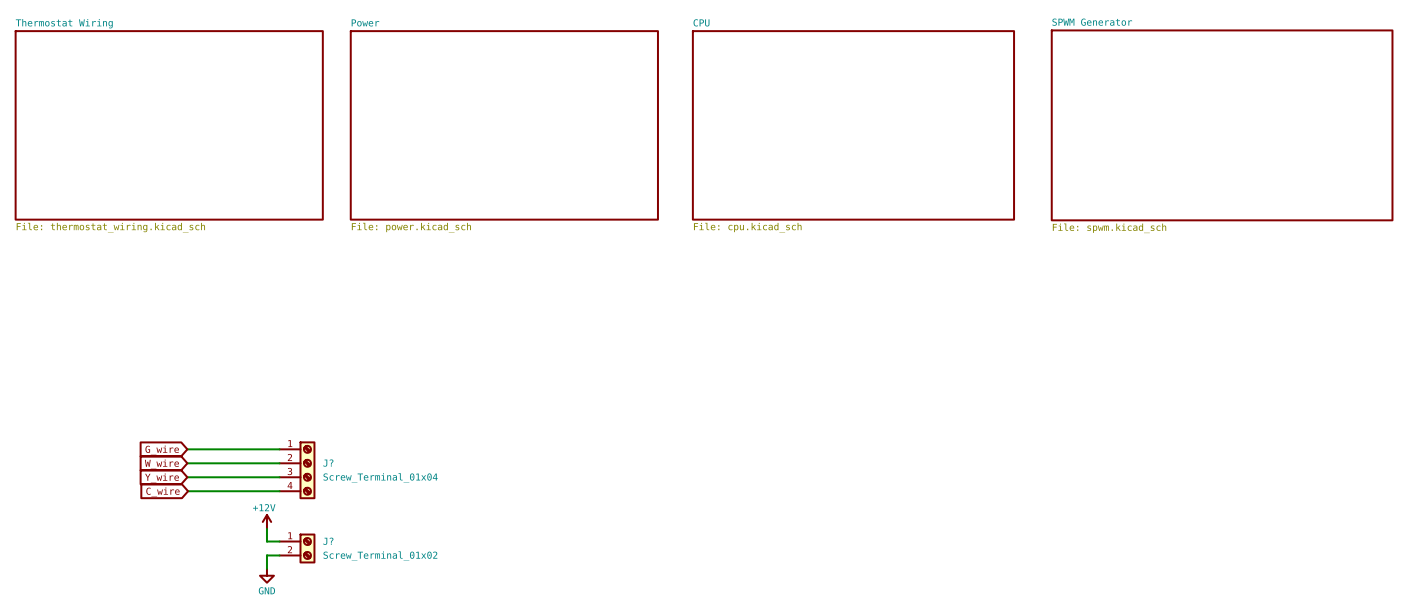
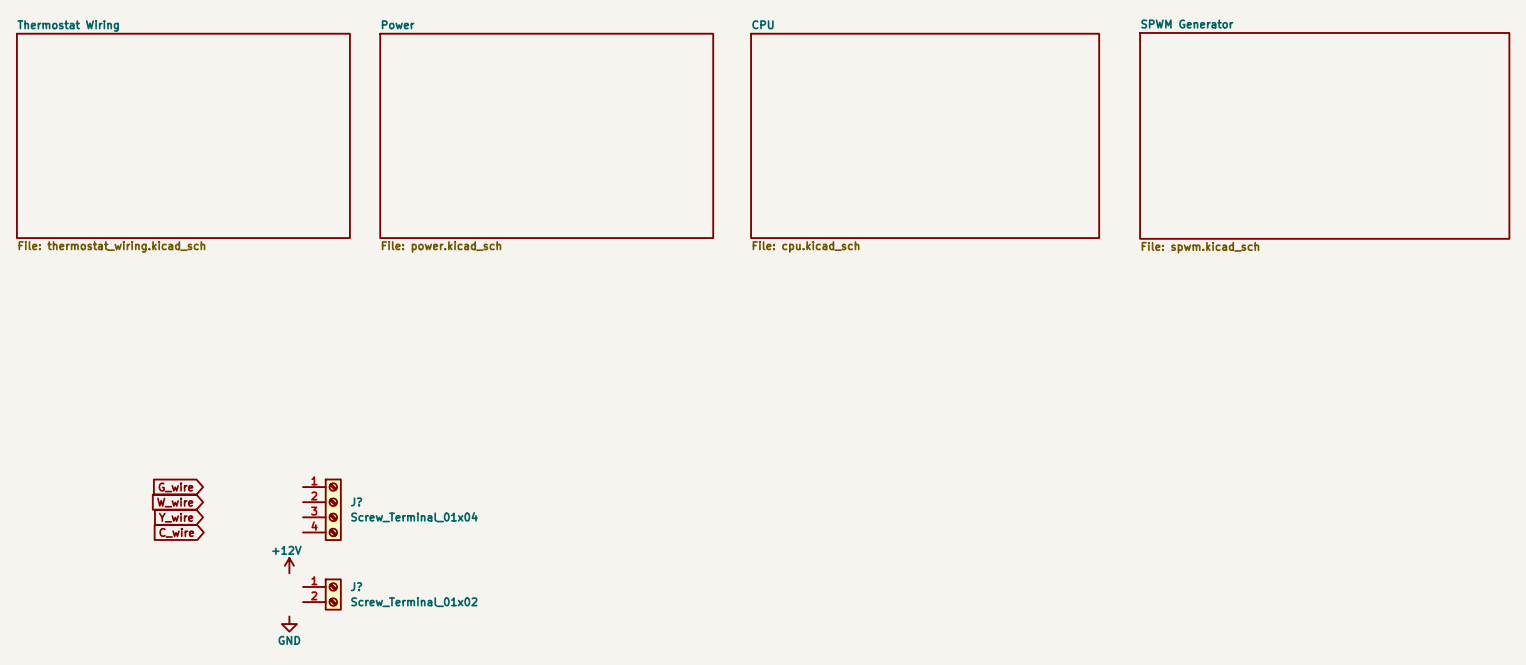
wire: (187, 449) (279, 449) -> none
wire: (187, 463) (279, 463) -> none
wire: (187, 477) (279, 477) -> none
wire: (188, 491) (279, 491) -> none
wire: (266, 528) (266, 541) (279, 541) -> none
wire: (279, 555) (266, 555) (266, 568) -> none

